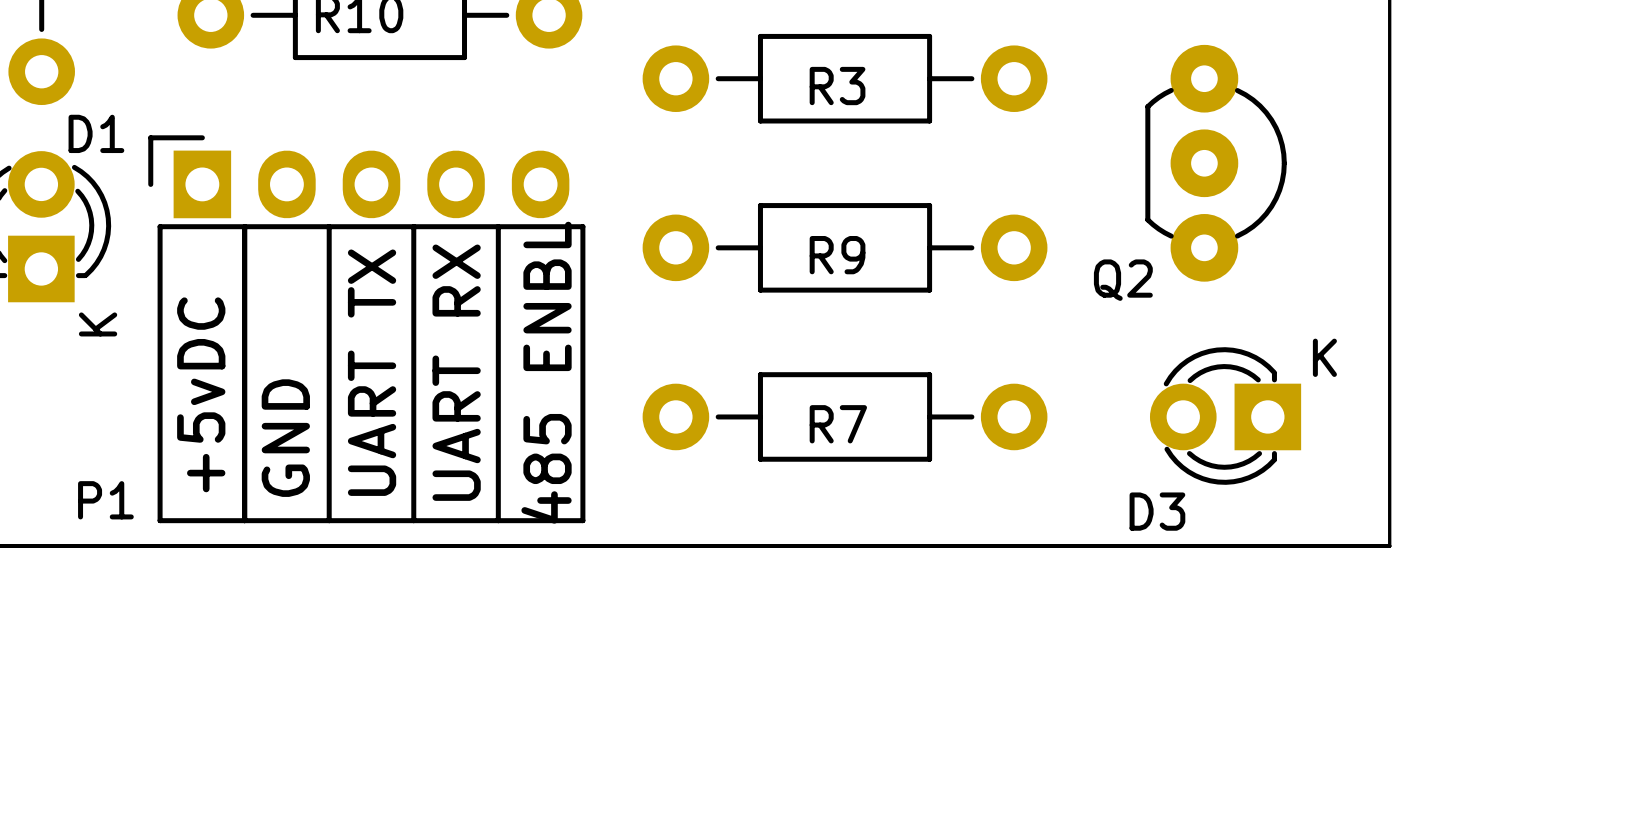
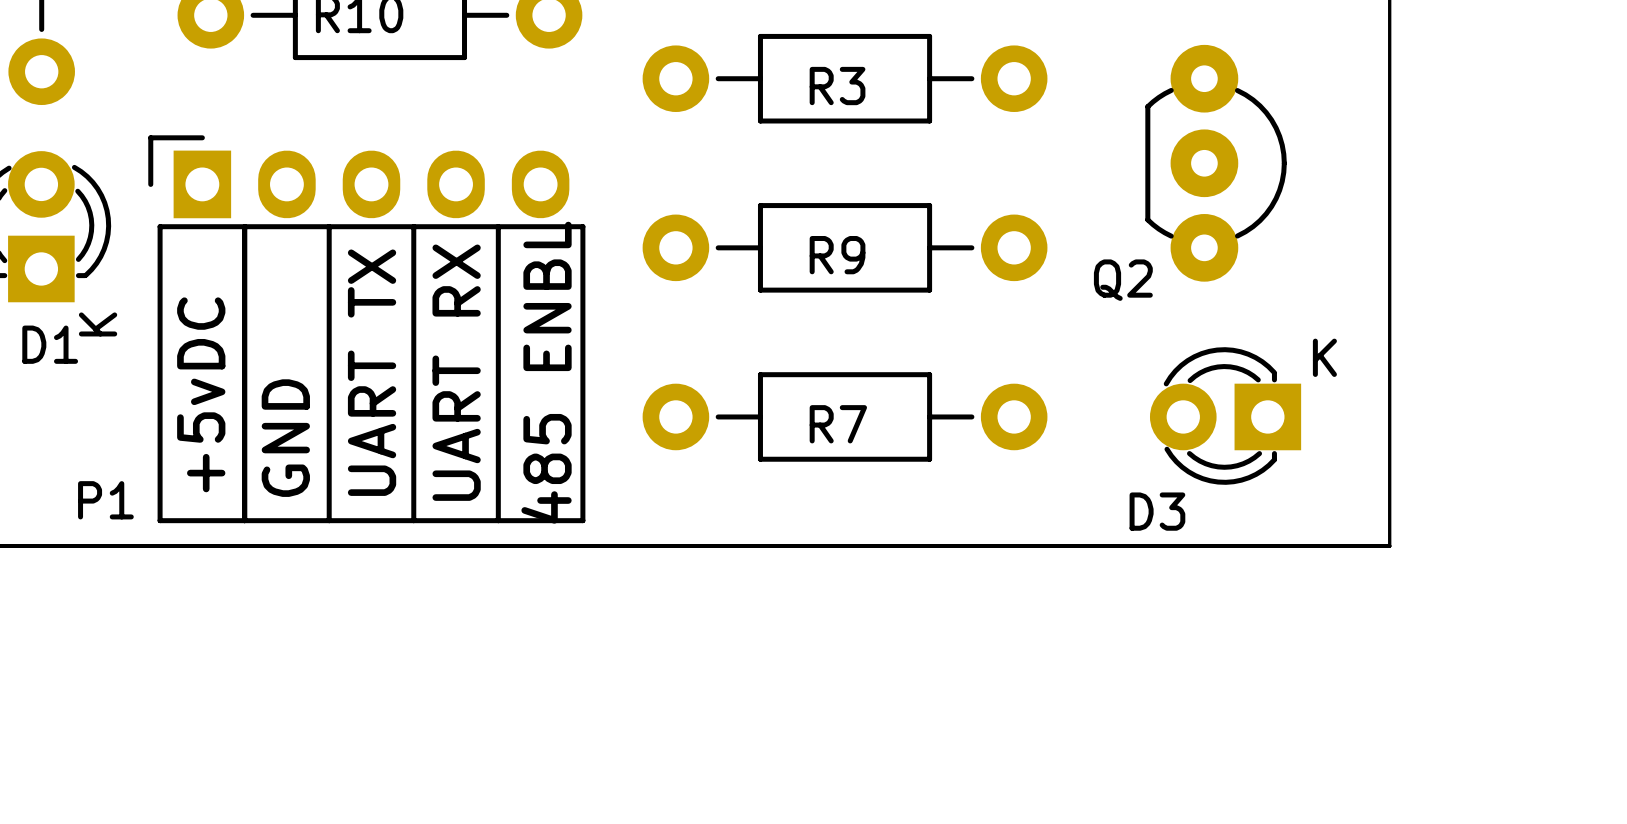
D1 name position: D1 (96, 133) -> D1 (50, 344)

